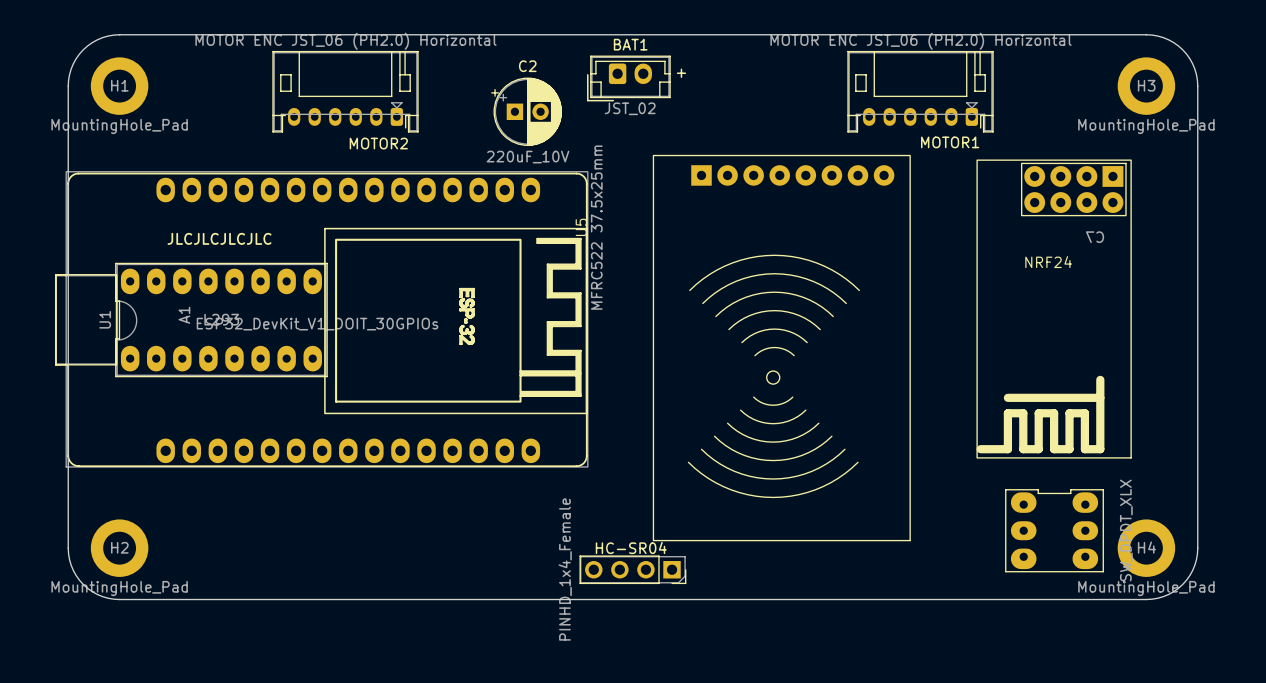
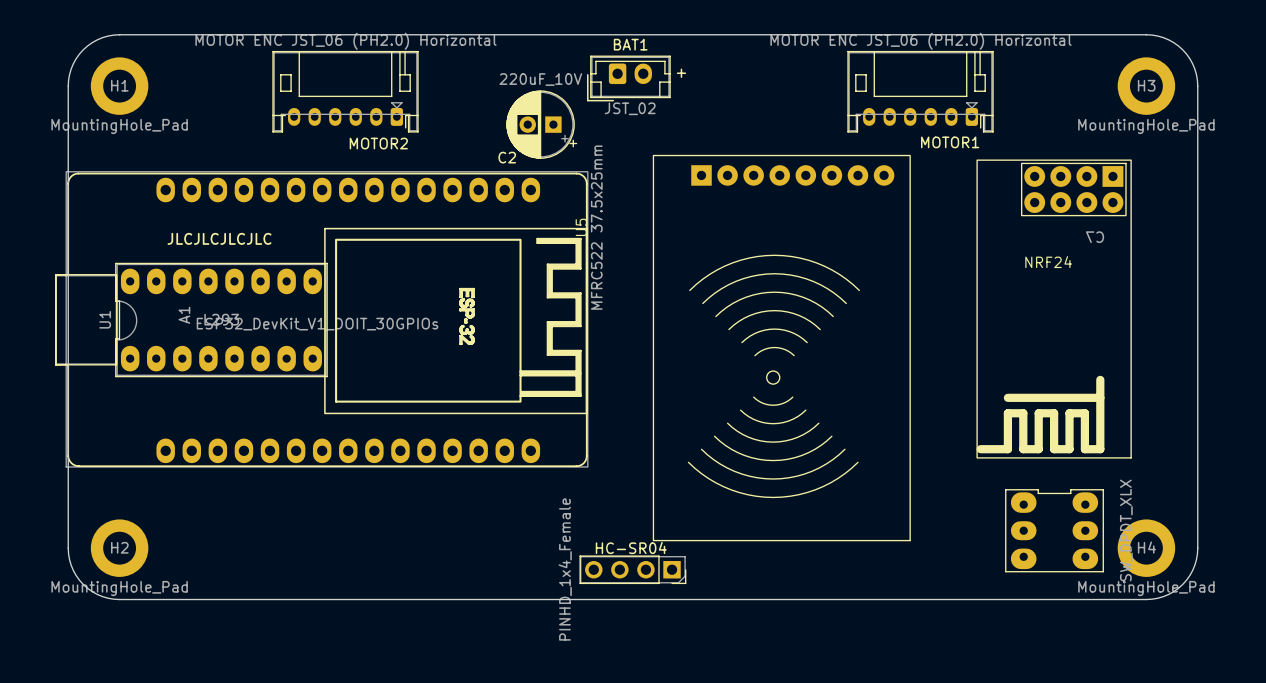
C2 name position: C2 (527, 66) -> C2 (507, 157)
C2 rotation: 0° (526, 111) -> 180° (541, 124)

